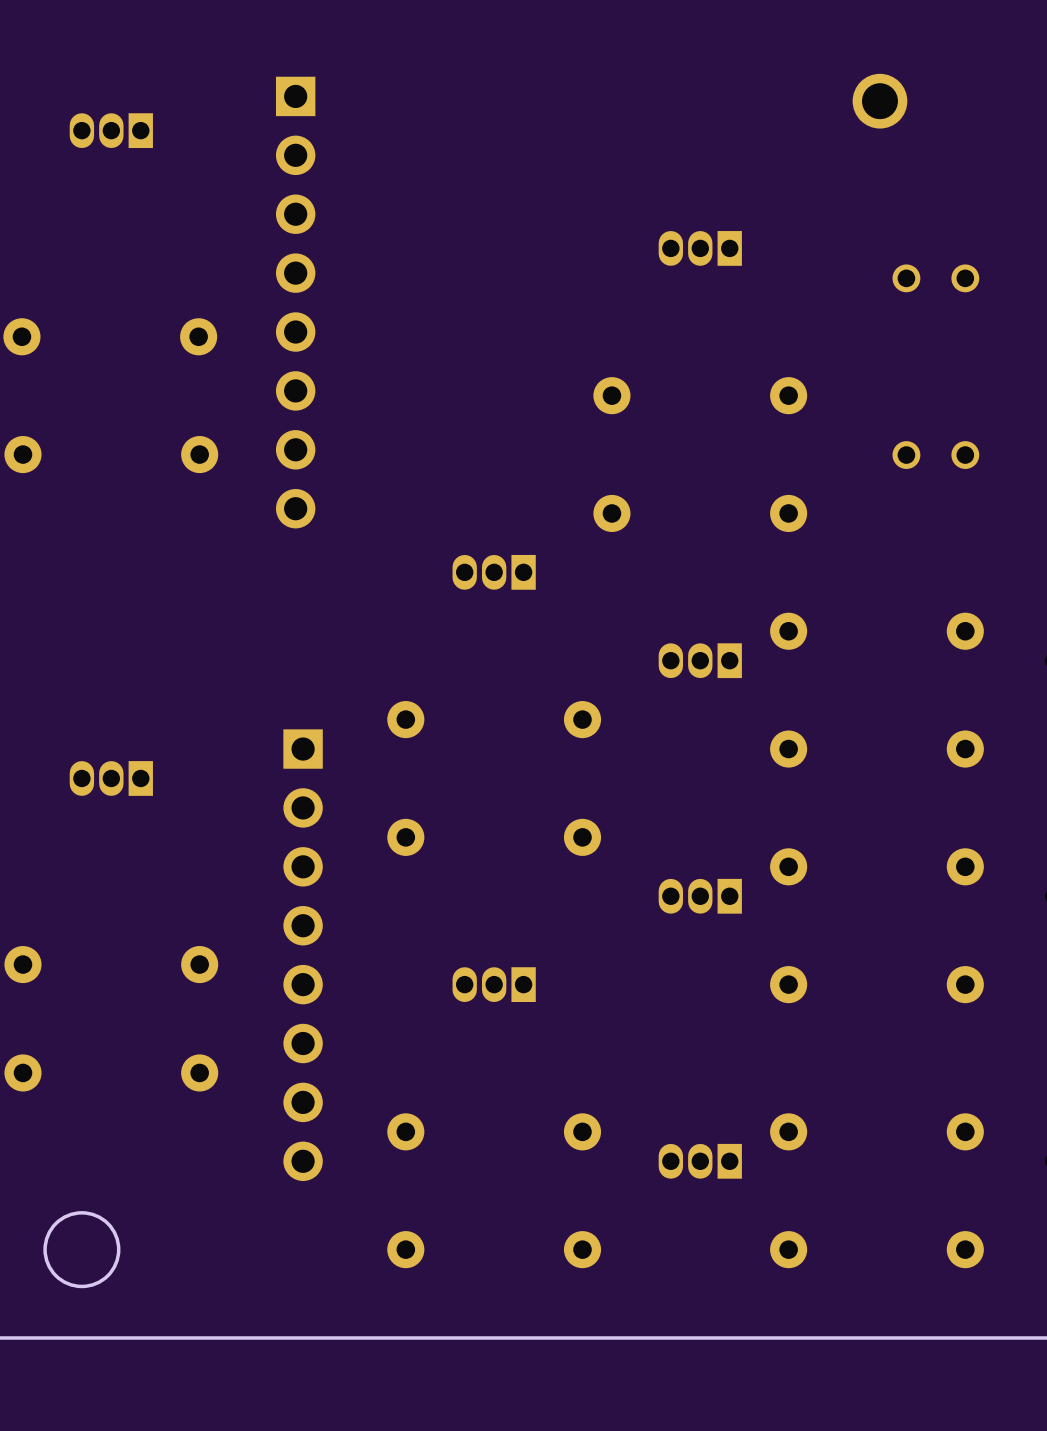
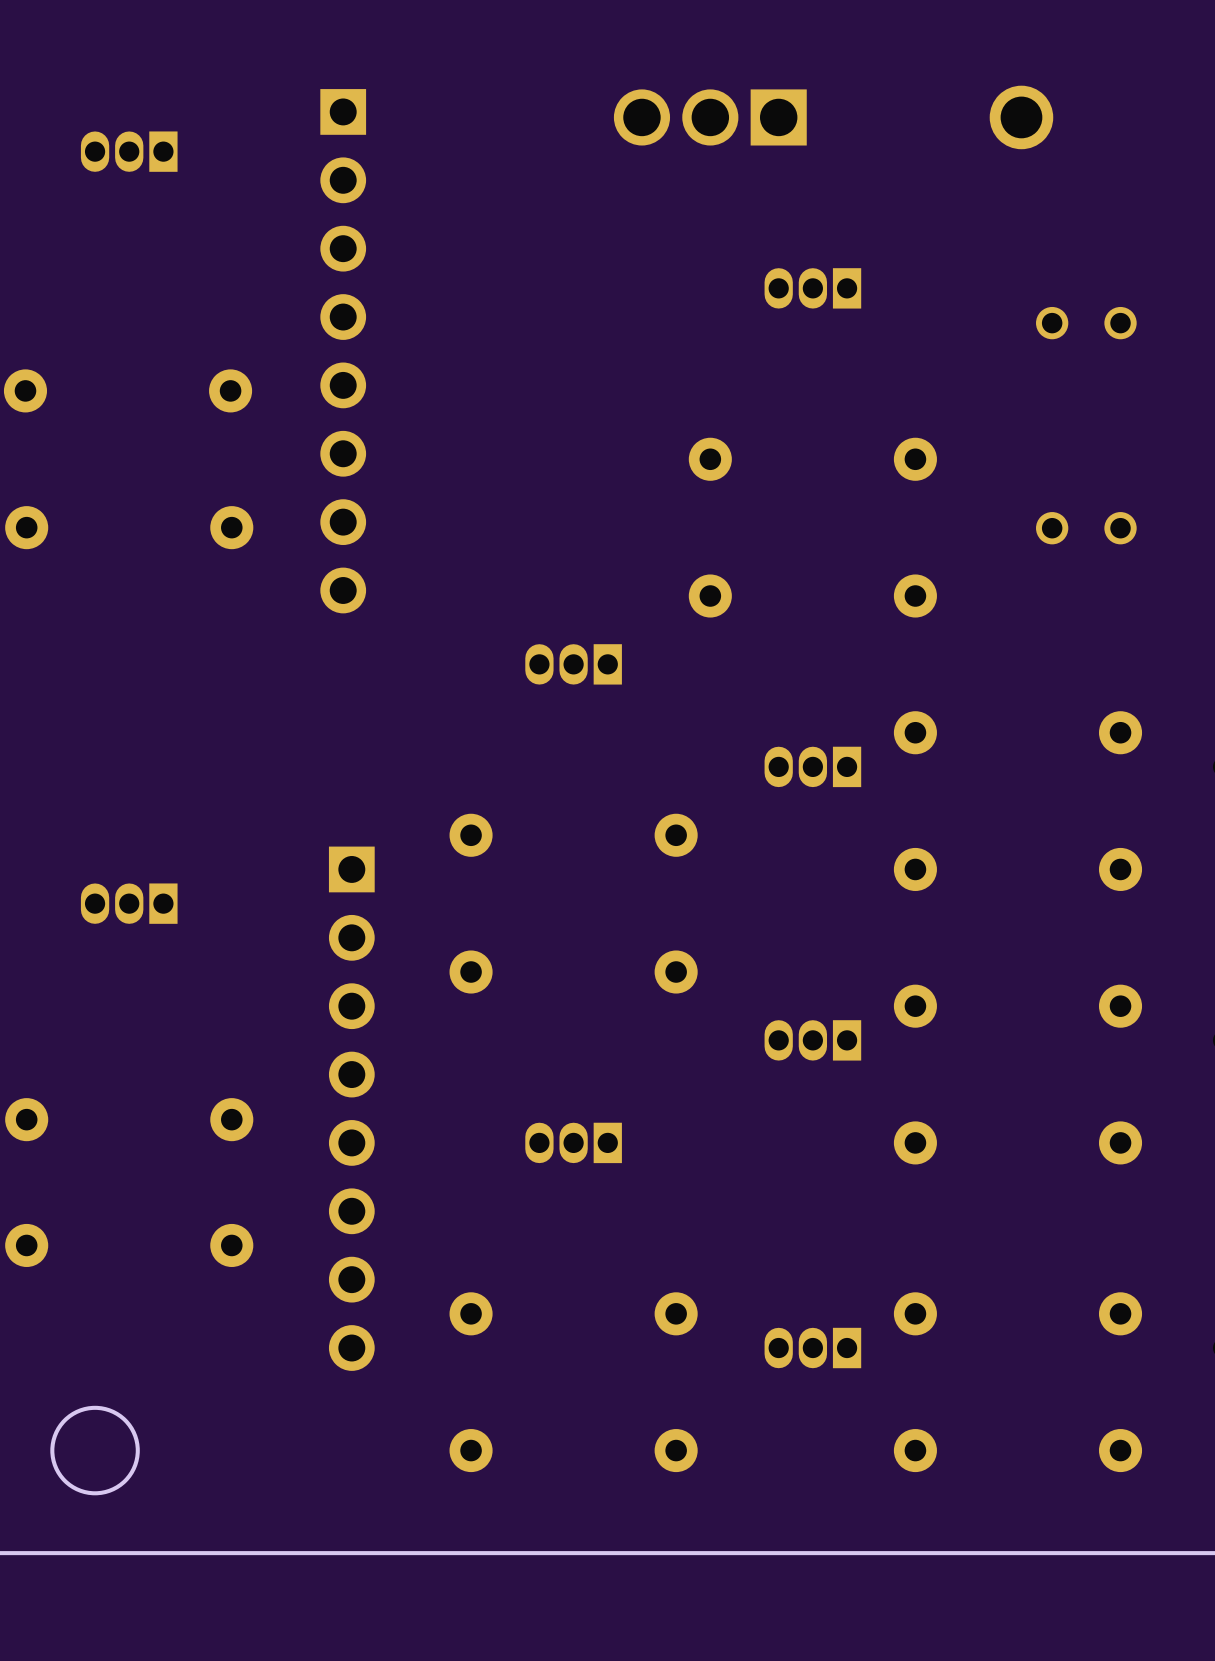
part: none -> (710, 117)

